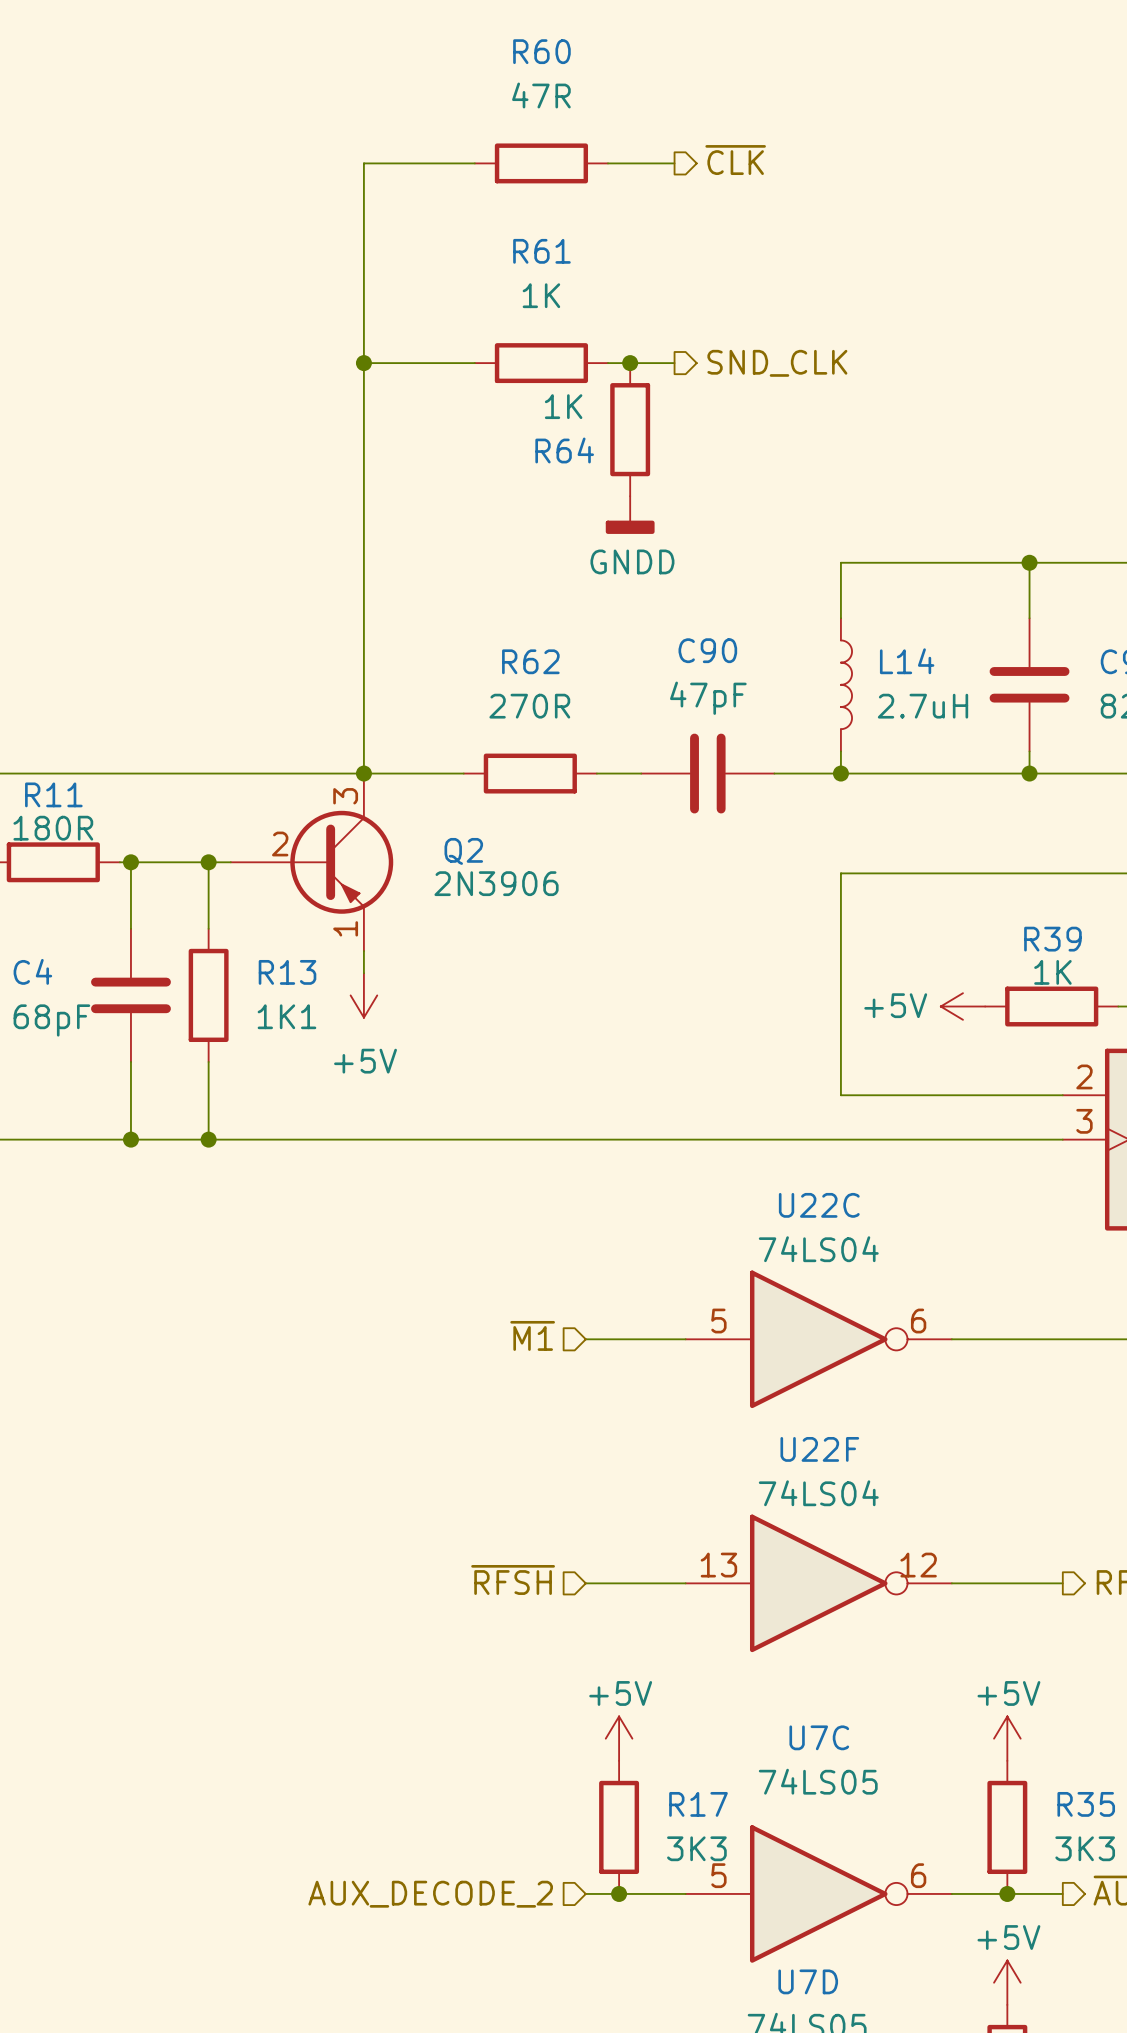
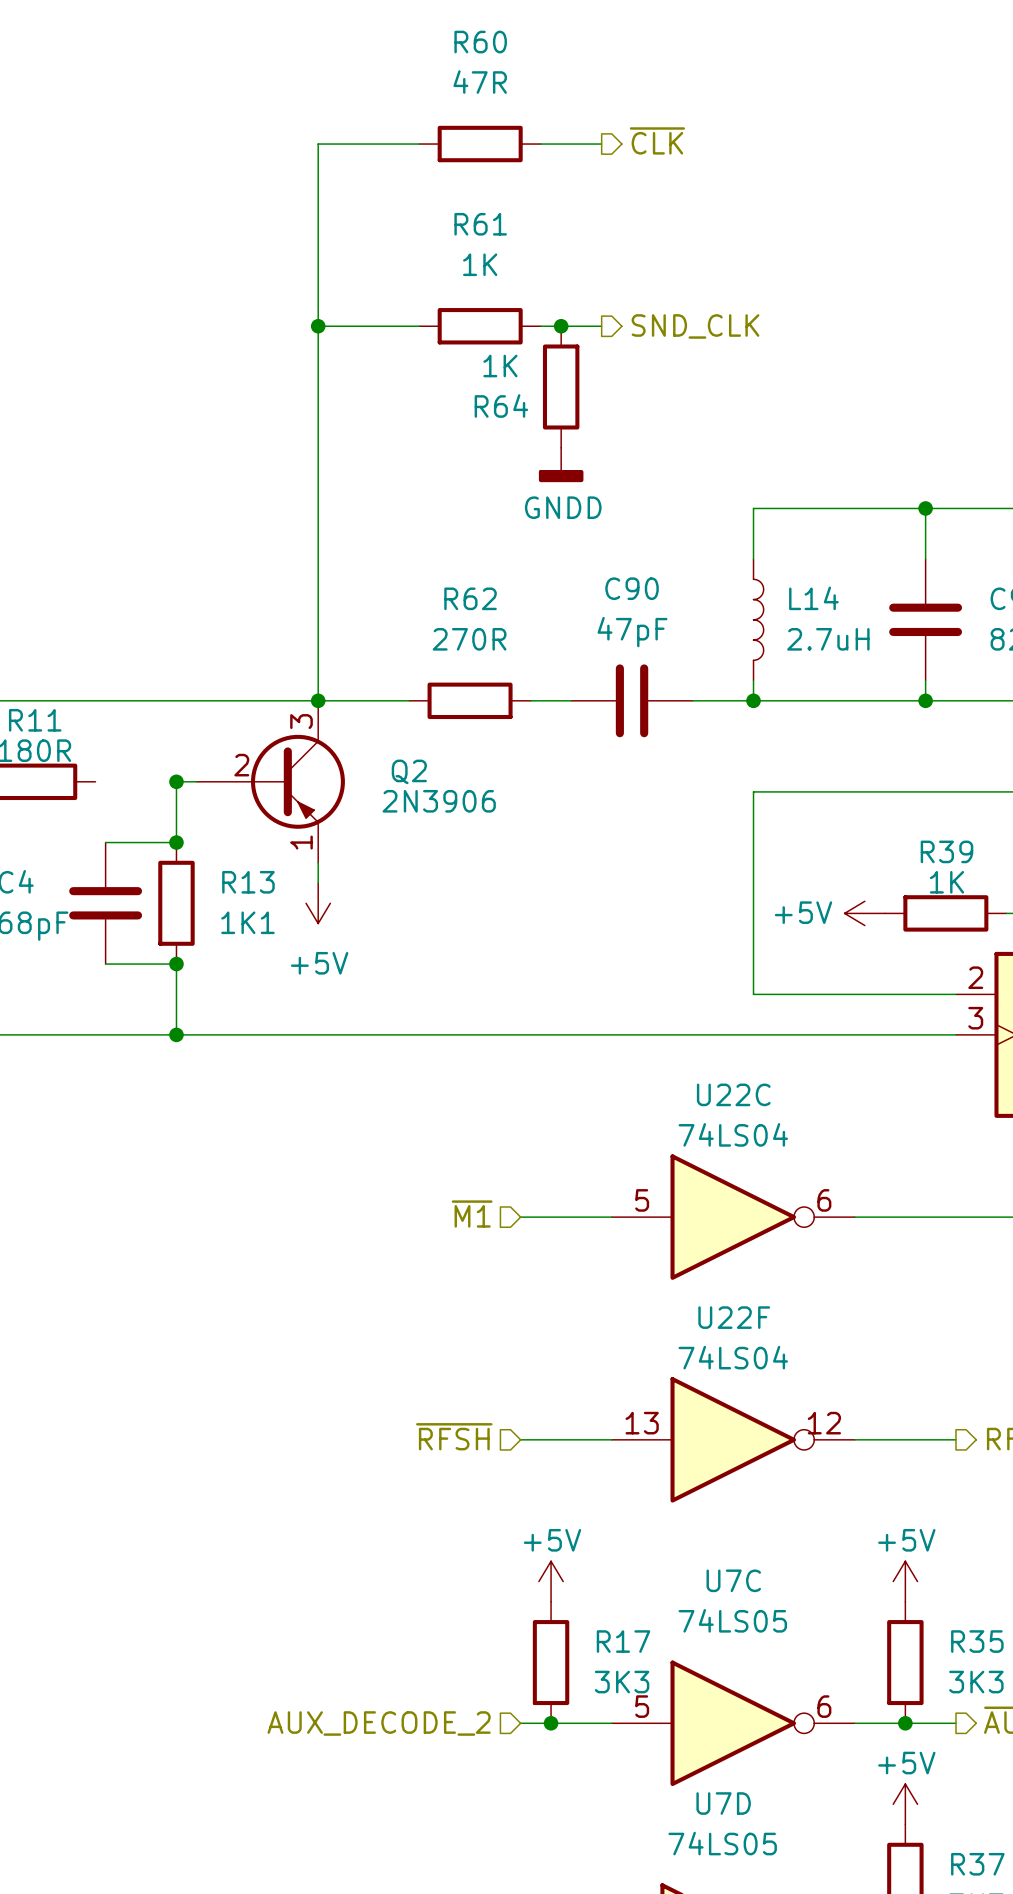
wire: (119, 862) (208, 862) -> none
wire: (130, 862) (130, 928) -> (176, 842) (105, 842)
junction position: (130, 862) -> (176, 842)
wire: (130, 1061) (130, 1139) -> (105, 964) (176, 964)
junction: none -> (176, 964)
junction: (130, 1139) -> none

